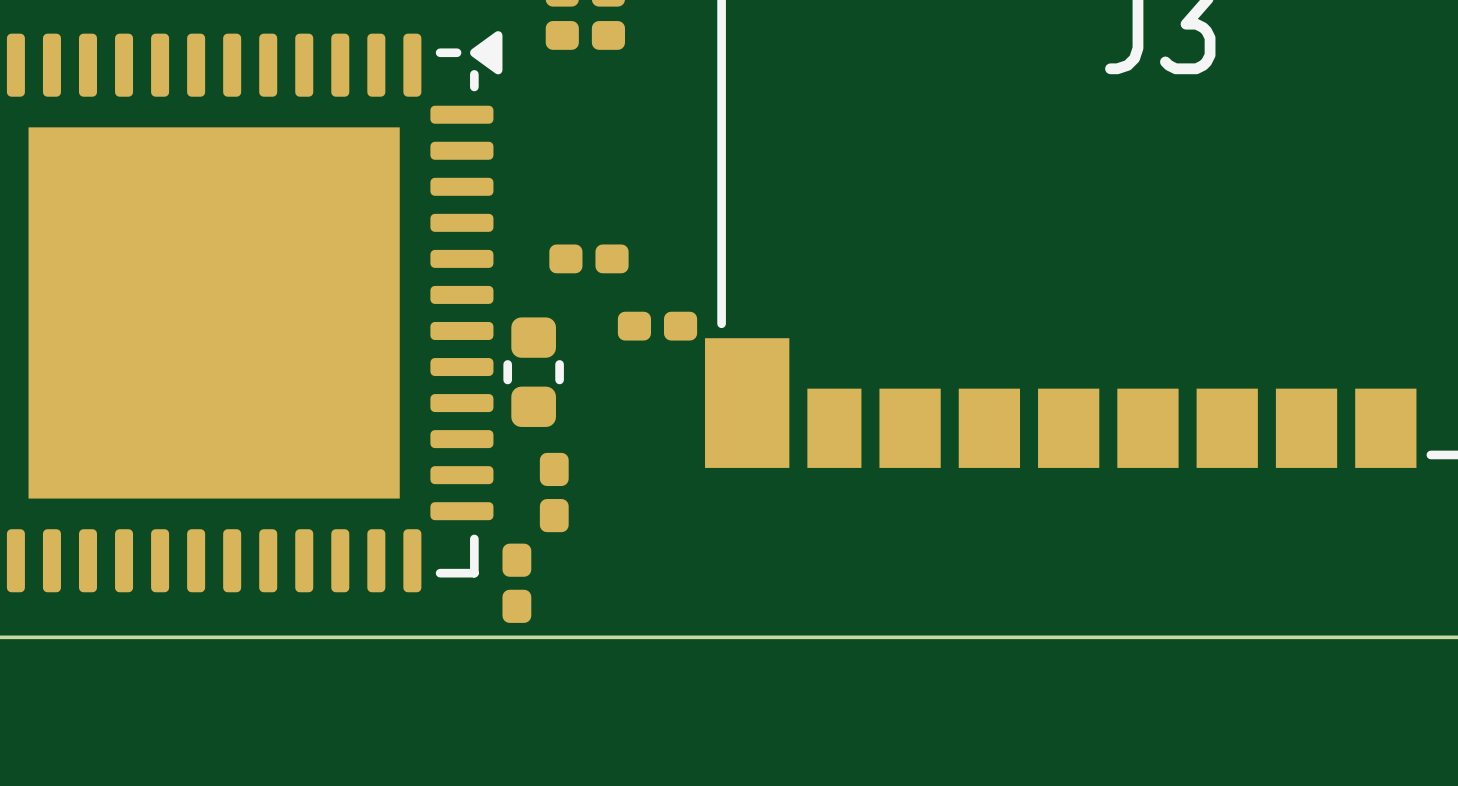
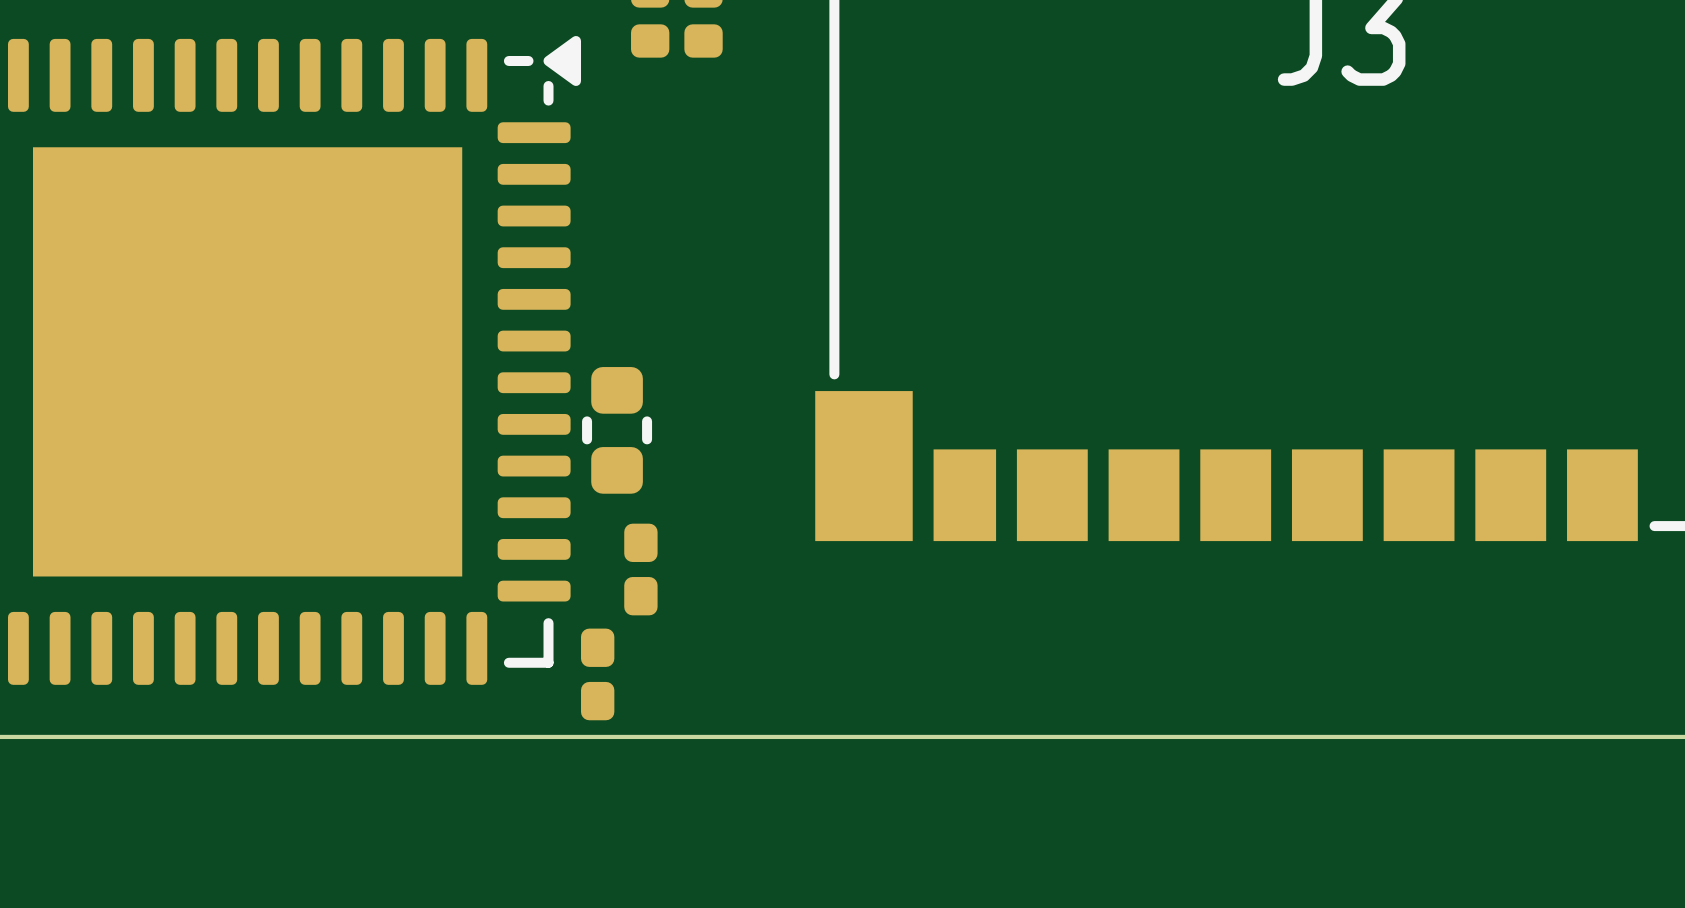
part: (588, 258) -> none
part: (657, 326) -> none

